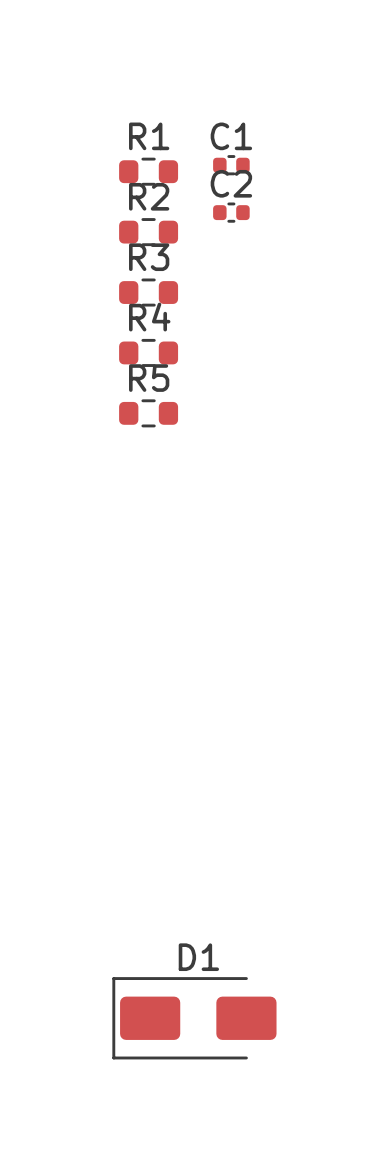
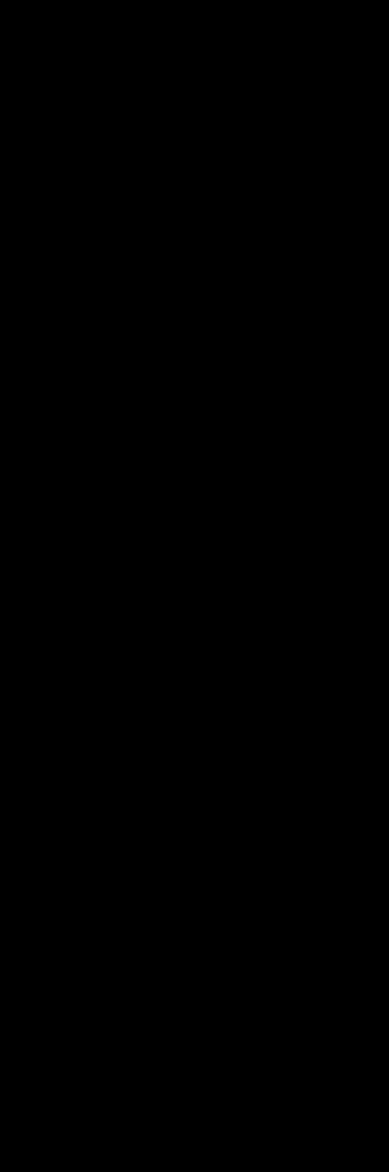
C1: (231, 165) -> none
R1: (148, 171) -> none
C2: (231, 212) -> none
R2: (148, 232) -> none
R3: (148, 292) -> none
R4: (148, 352) -> none
R5: (148, 413) -> none
D1: (194, 1018) -> none

